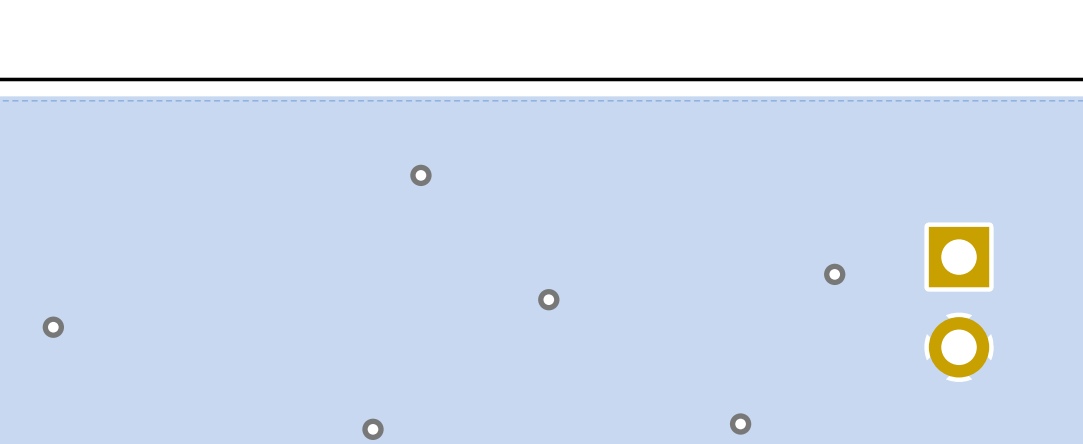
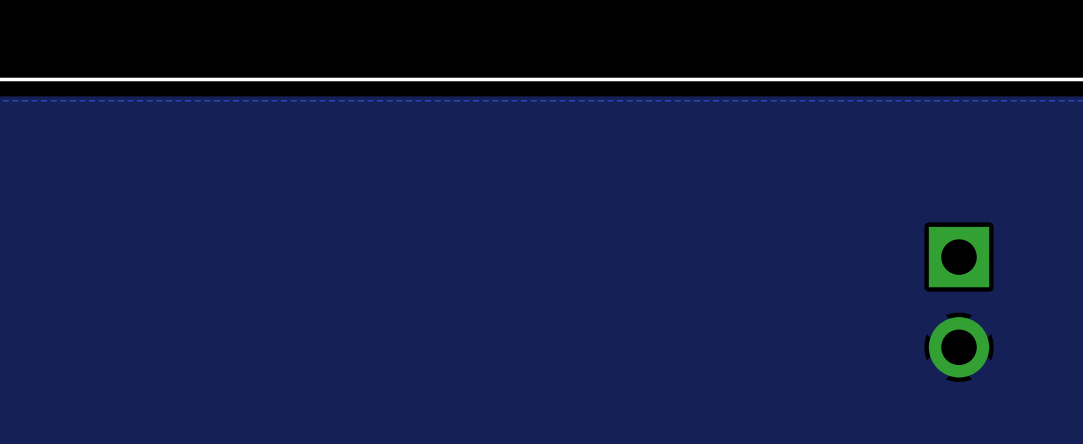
via: (420, 175) -> none
via: (834, 274) -> none
via: (548, 299) -> none
via: (53, 327) -> none
via: (740, 424) -> none
via: (372, 429) -> none

